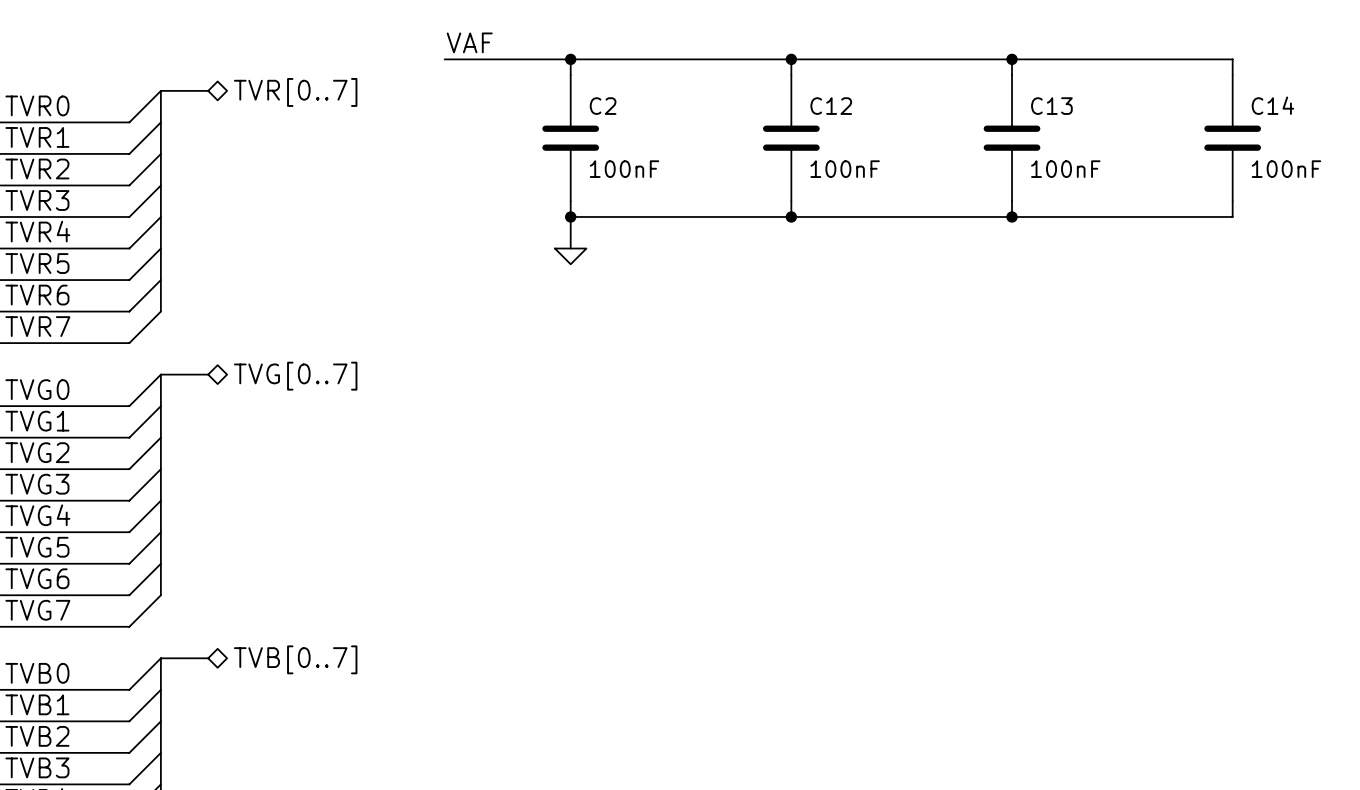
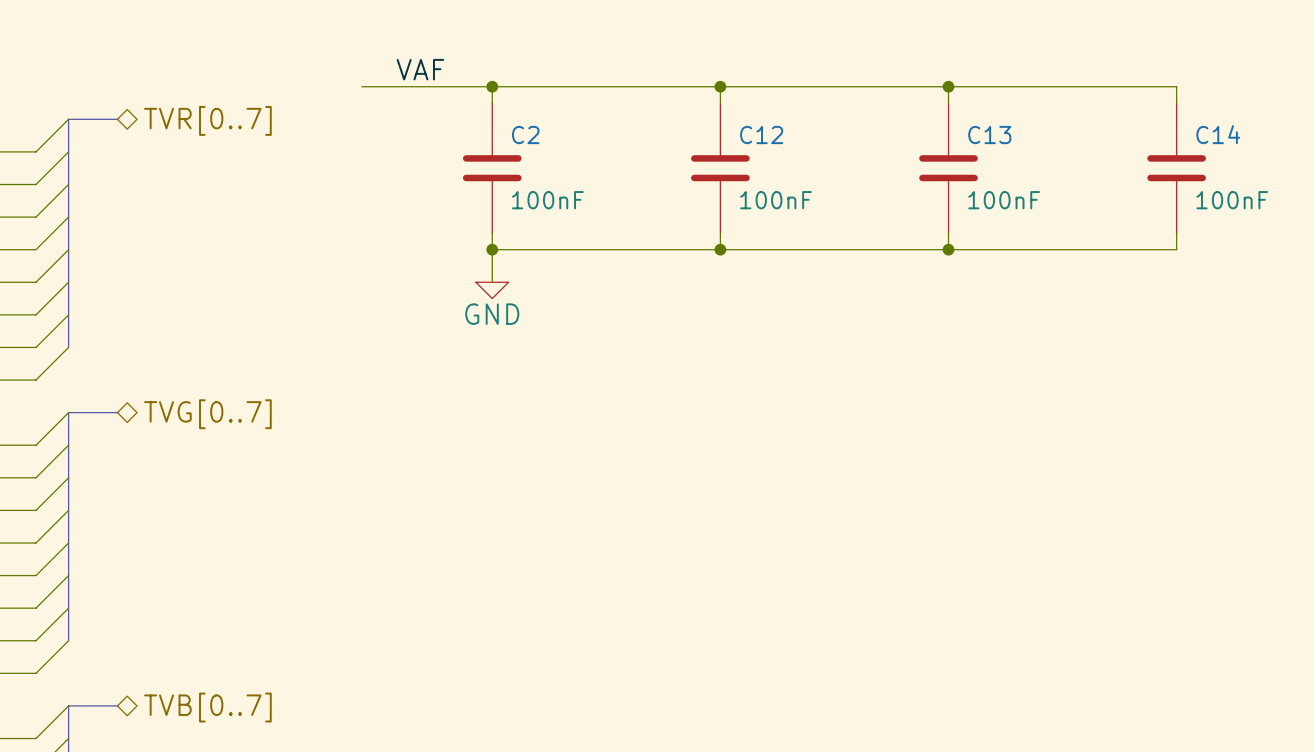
label position: VAF (469, 42) -> VAF (420, 69)
power symbol text: none -> GND (492, 314)

